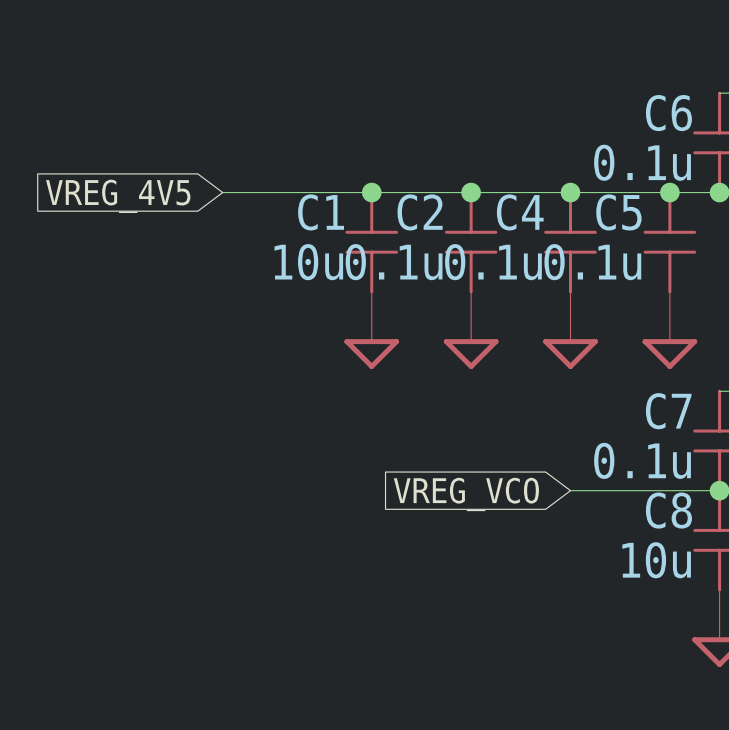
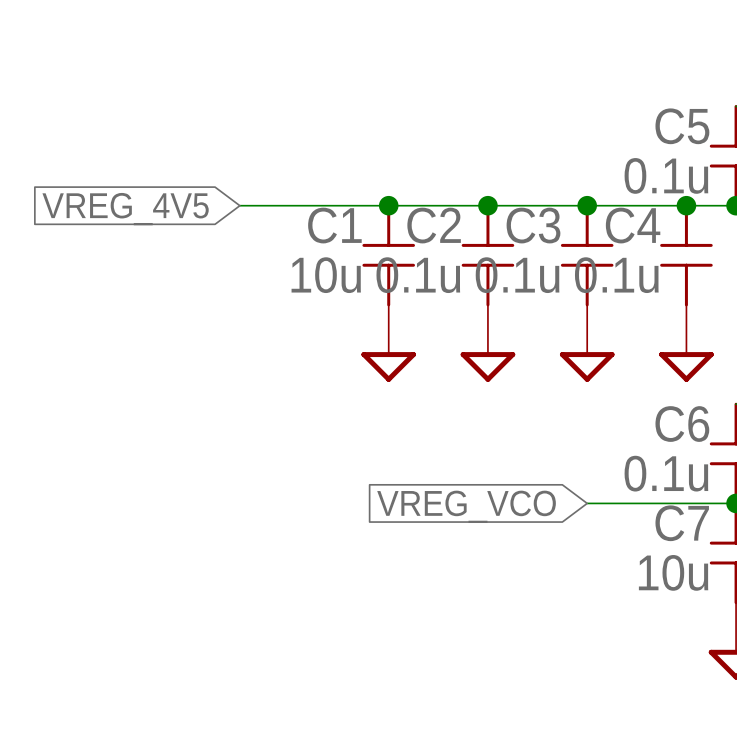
C6 name: C6 (668, 113) -> C5 (682, 126)
C4 name: C4 (520, 212) -> C3 (533, 225)
C5 name: C5 (618, 212) -> C4 (633, 225)
C7 name: C7 (668, 411) -> C6 (682, 424)
C8 name: C8 (668, 510) -> C7 (682, 523)

